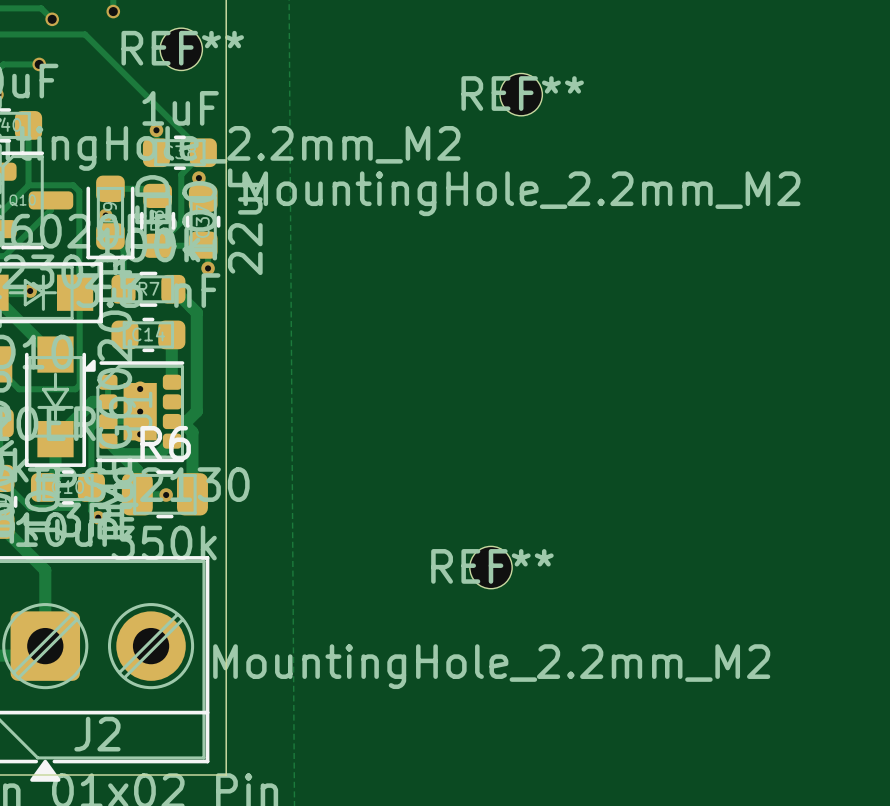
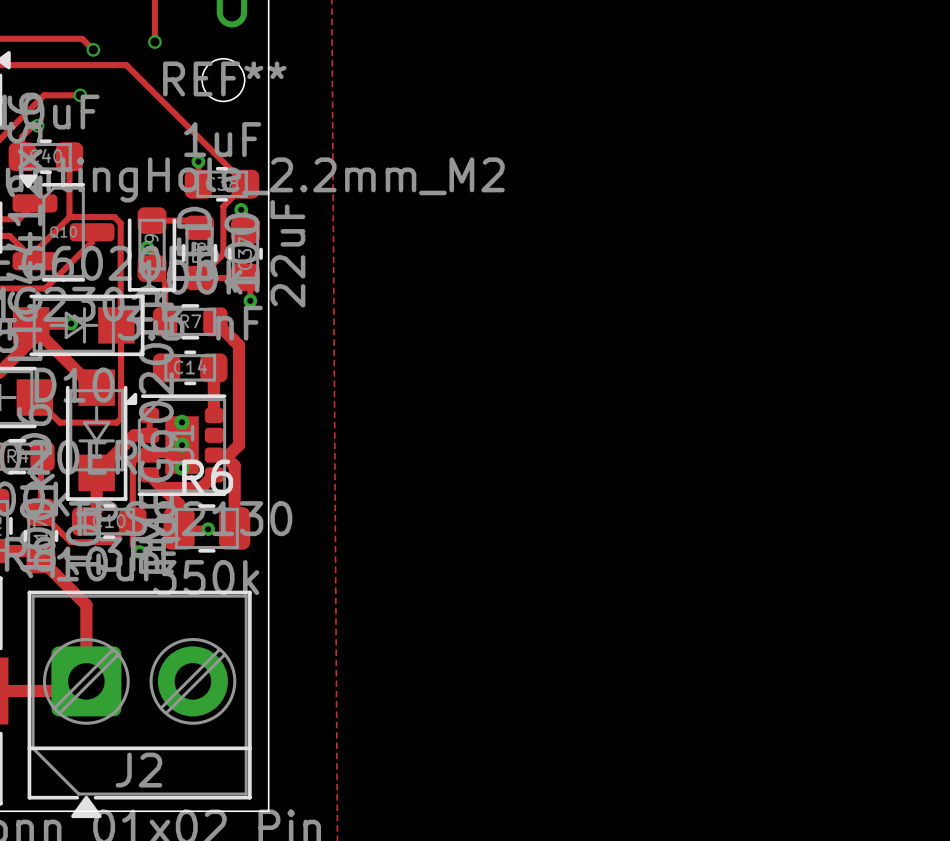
REF**: MountingHole_2.2mm_M2 (521, 94) -> none
REF**: MountingHole_2.2mm_M2 (490, 567) -> none

